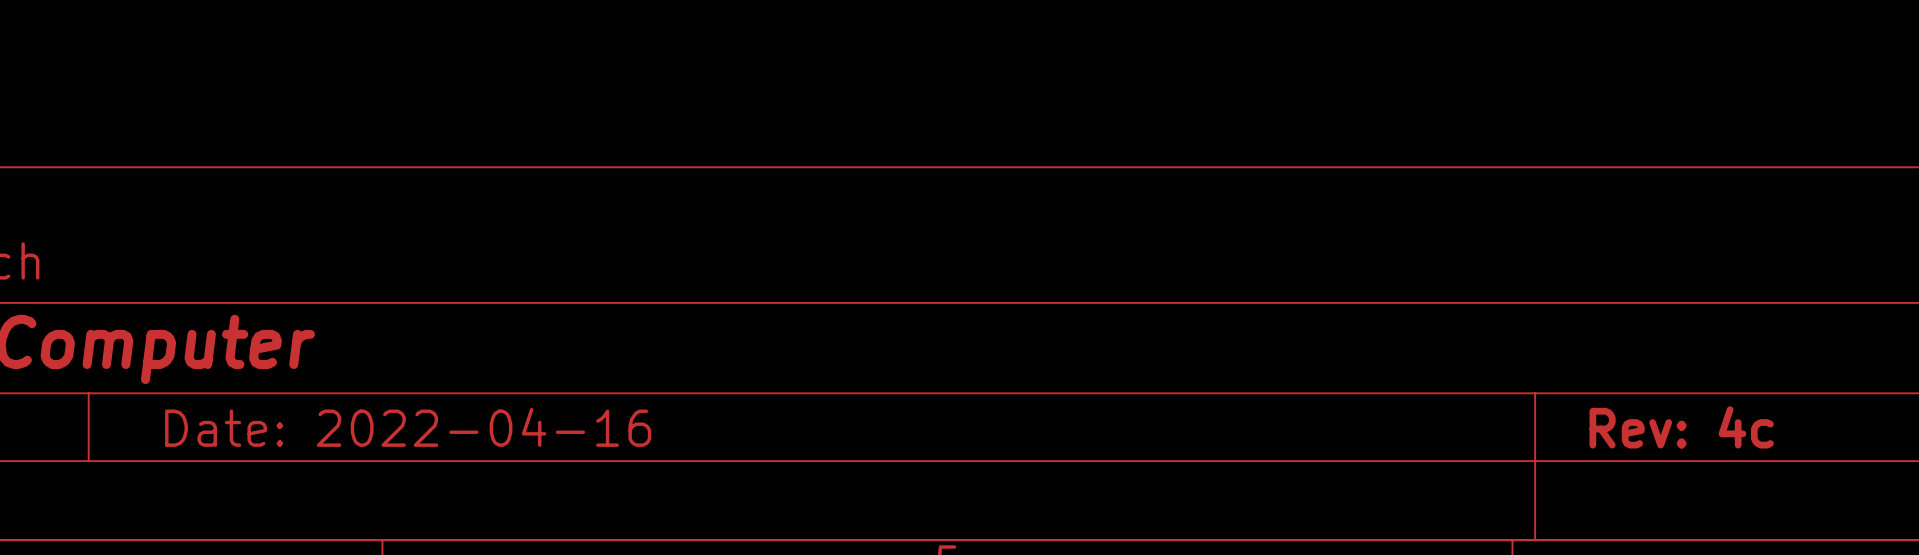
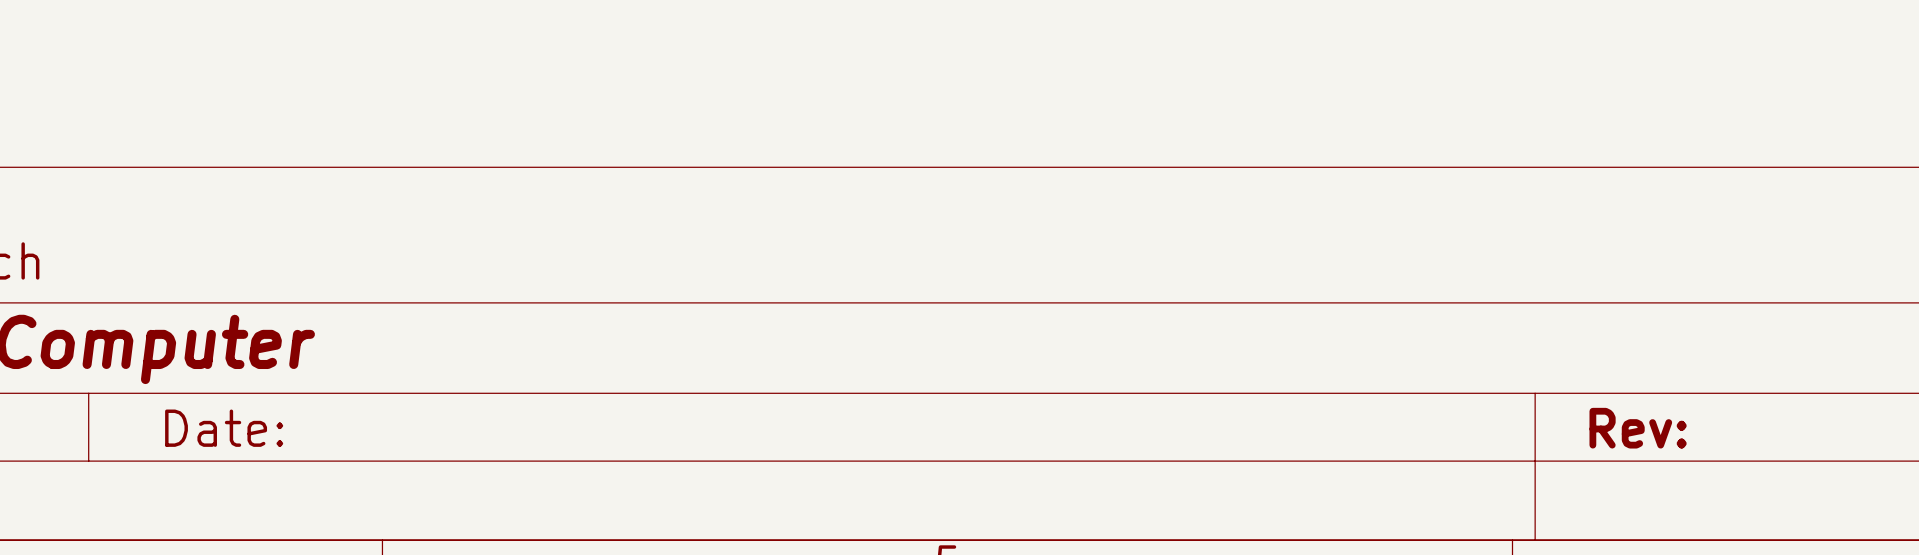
title block: Date: 2022-04-16 (408, 427) -> Date: (224, 428)
title block: Rev: 4c (1681, 427) -> Rev: (1638, 428)

